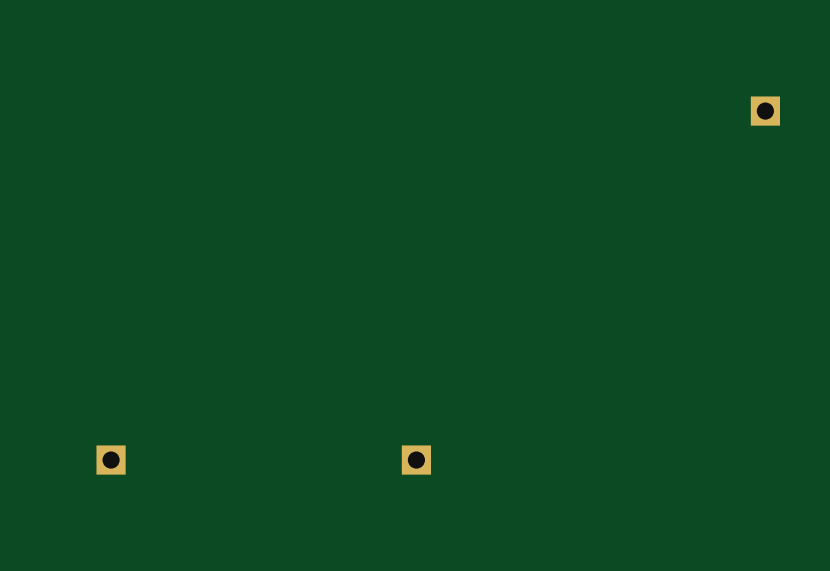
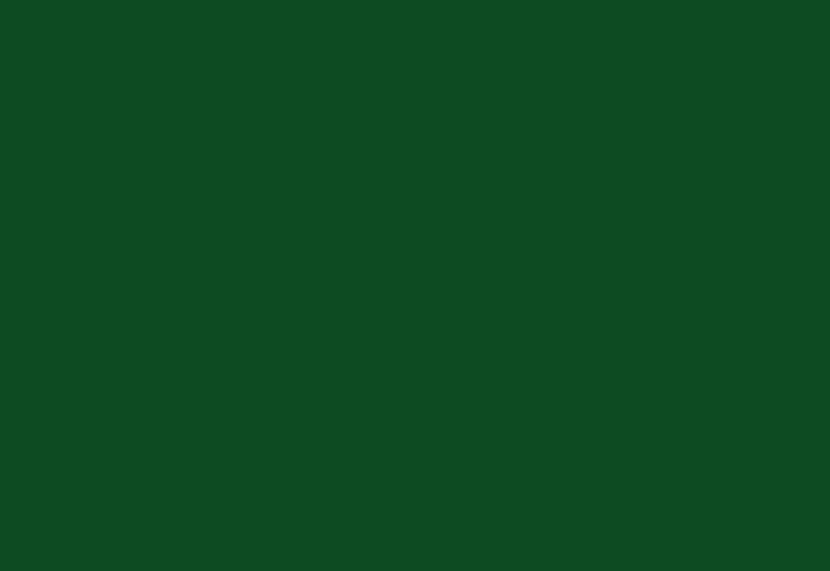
part: (765, 111) -> none
part: (111, 460) -> none
part: (416, 460) -> none

